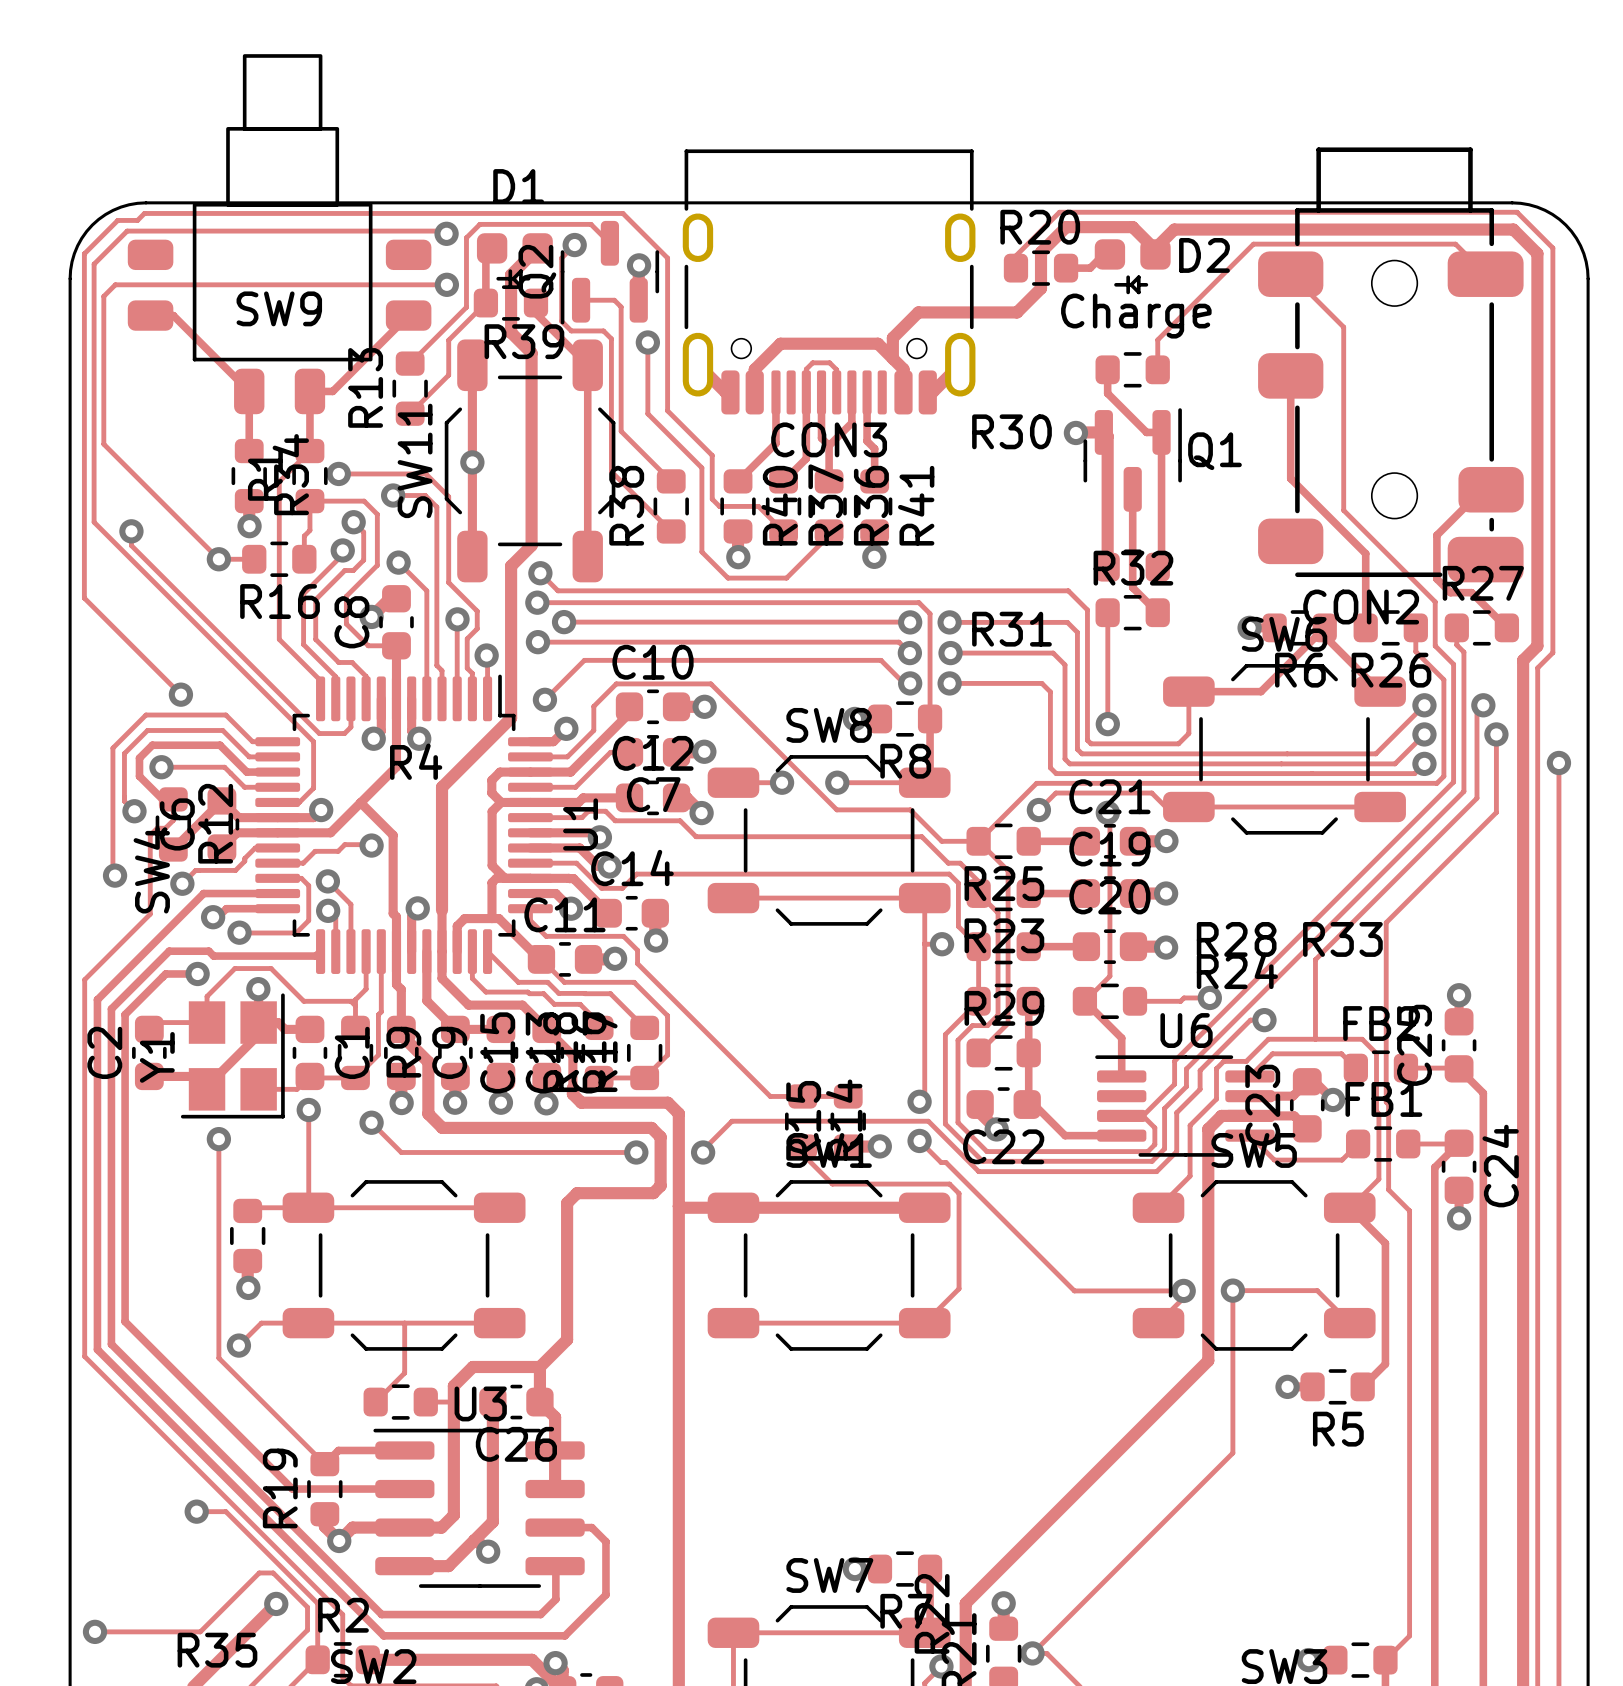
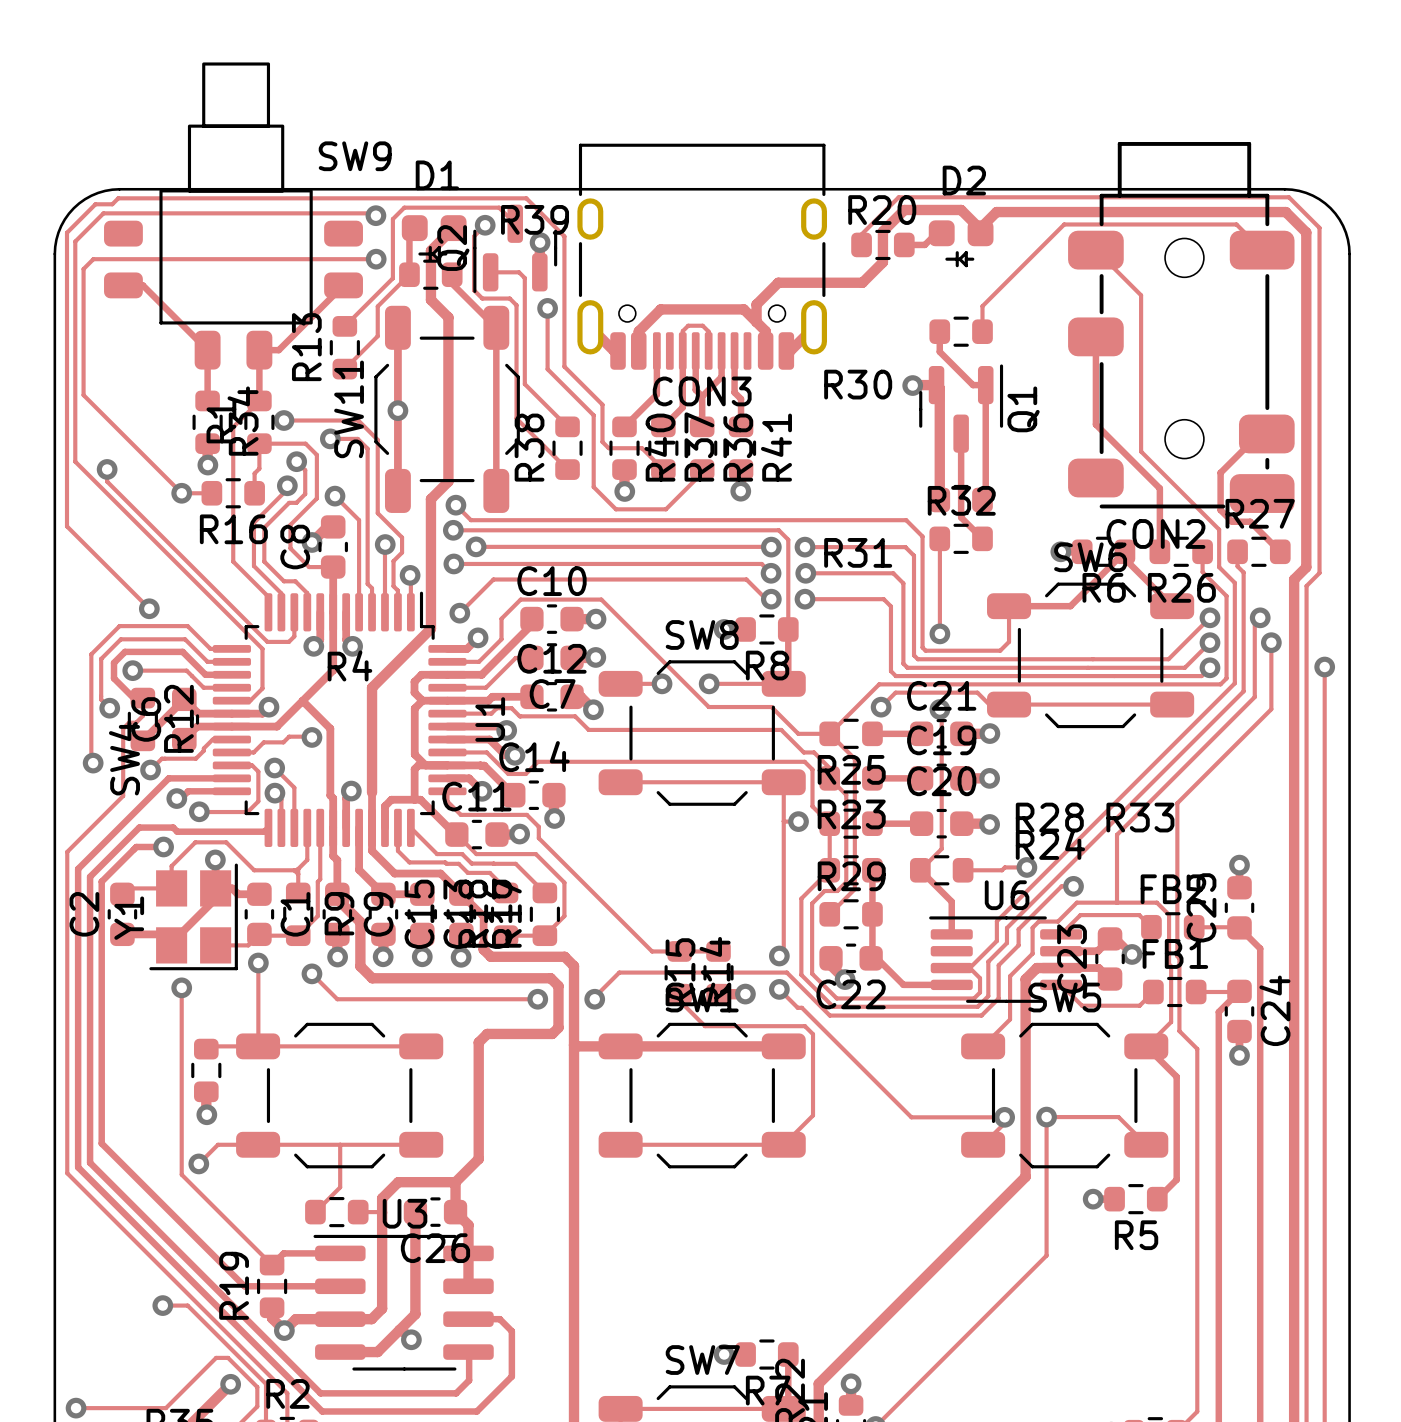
D2 name position: D2 (1204, 255) -> D2 (964, 180)
SW9 name position: SW9 (279, 308) -> SW9 (355, 156)
D2 value: Charge (1136, 316) -> none
R39 name position: R39 (524, 341) -> R39 (535, 219)
Q1 name rotation: 0° (1214, 451) -> 90° counterclockwise (1023, 409)

